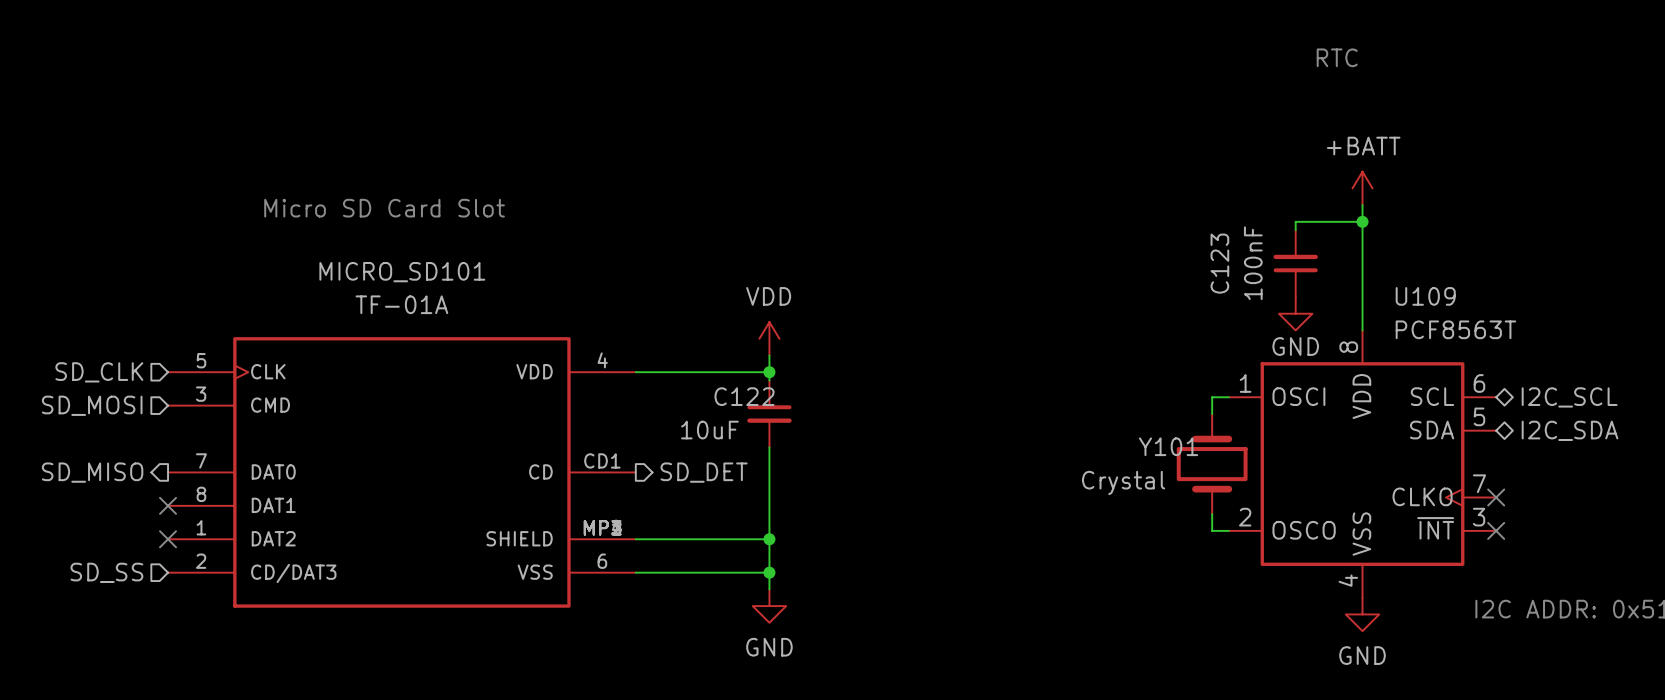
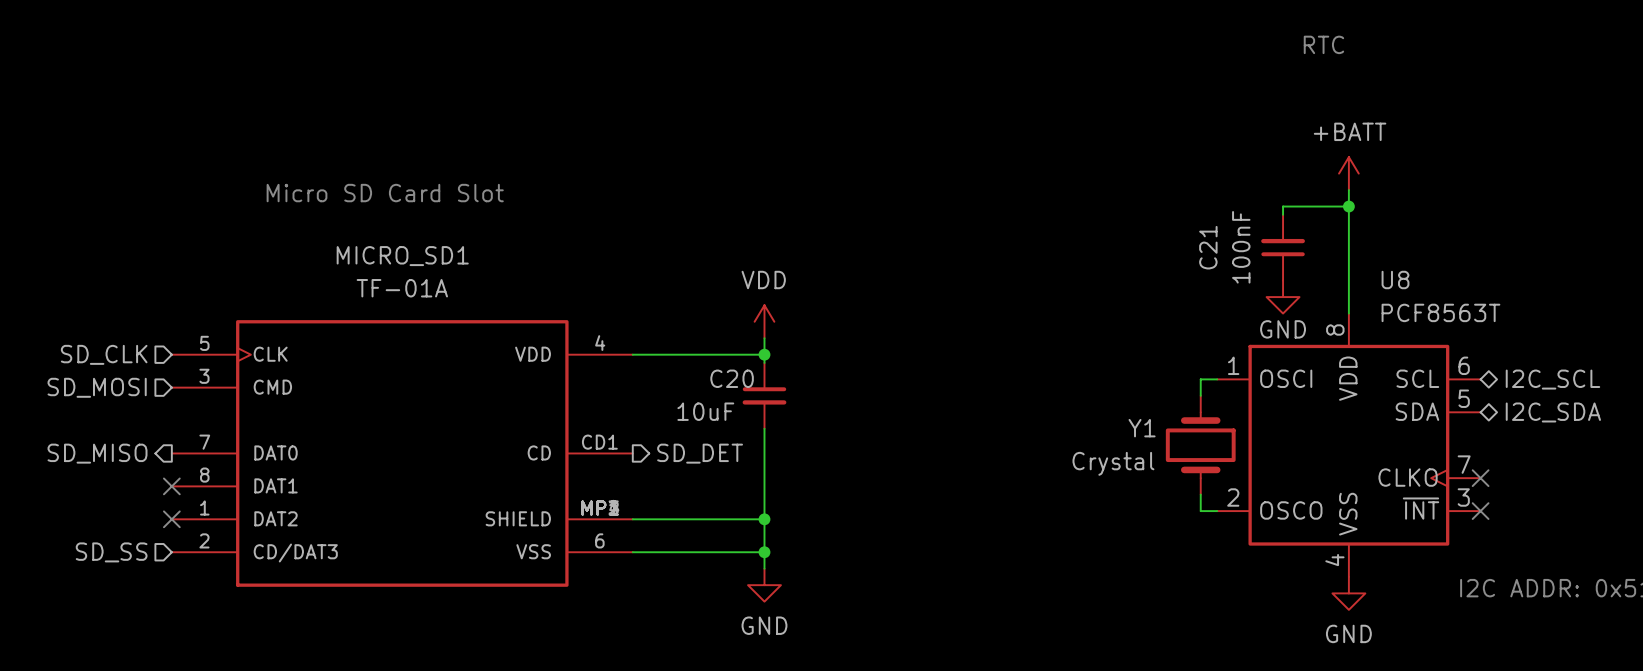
C123 name: C123 (1219, 263) -> C21 (1208, 247)
MICRO_SD101 name: MICRO_SD101 (402, 272) -> MICRO_SD1 (402, 256)
U109 name: U109 (1425, 296) -> U8 (1395, 279)
C122 name: C122 (744, 396) -> C20 (732, 378)
Y101 name: Y101 (1168, 446) -> Y1 (1142, 428)

